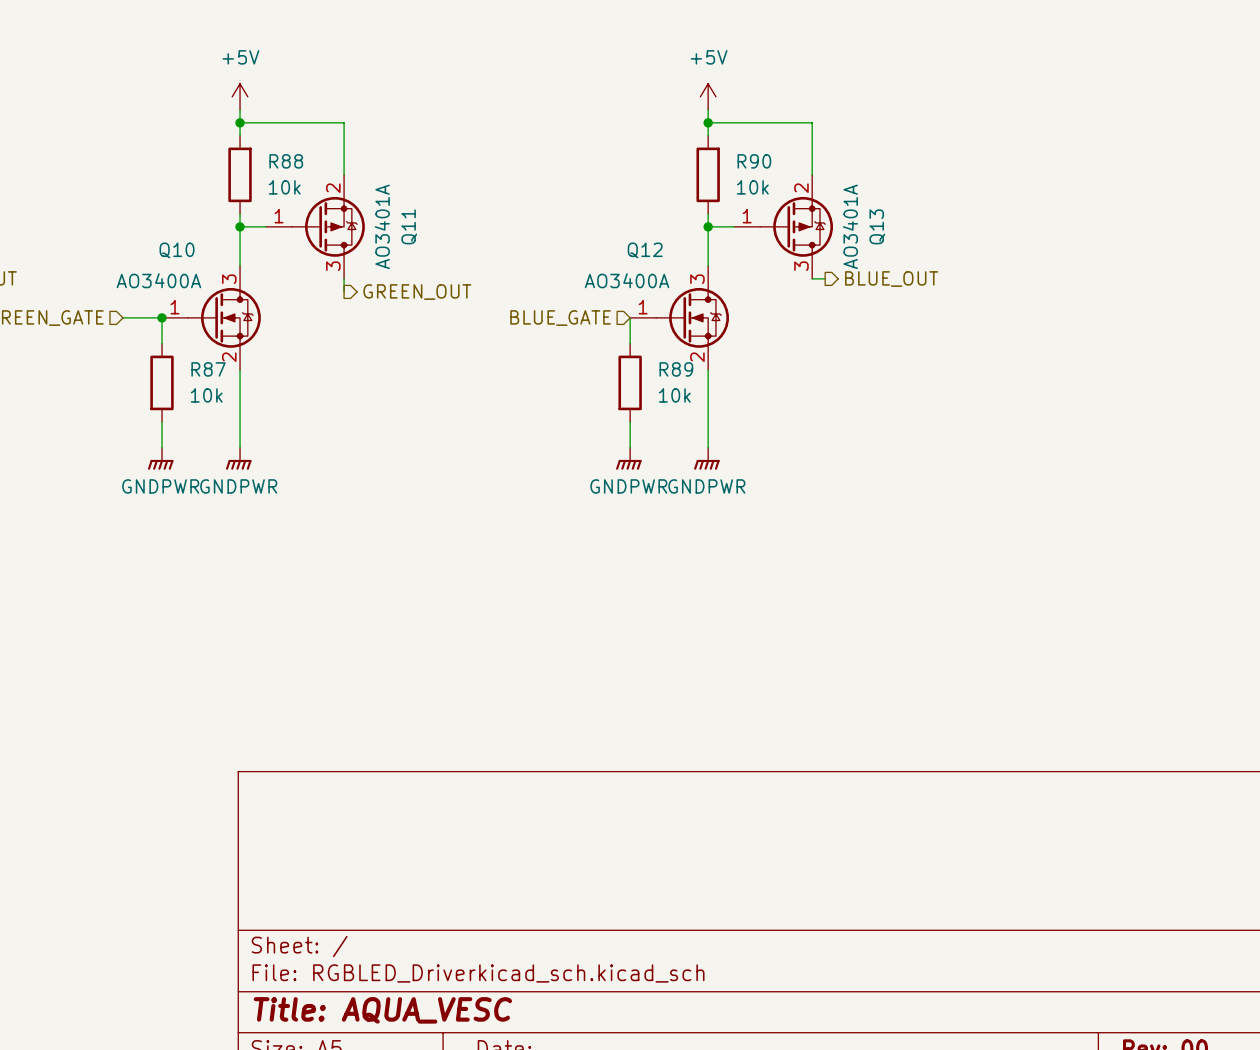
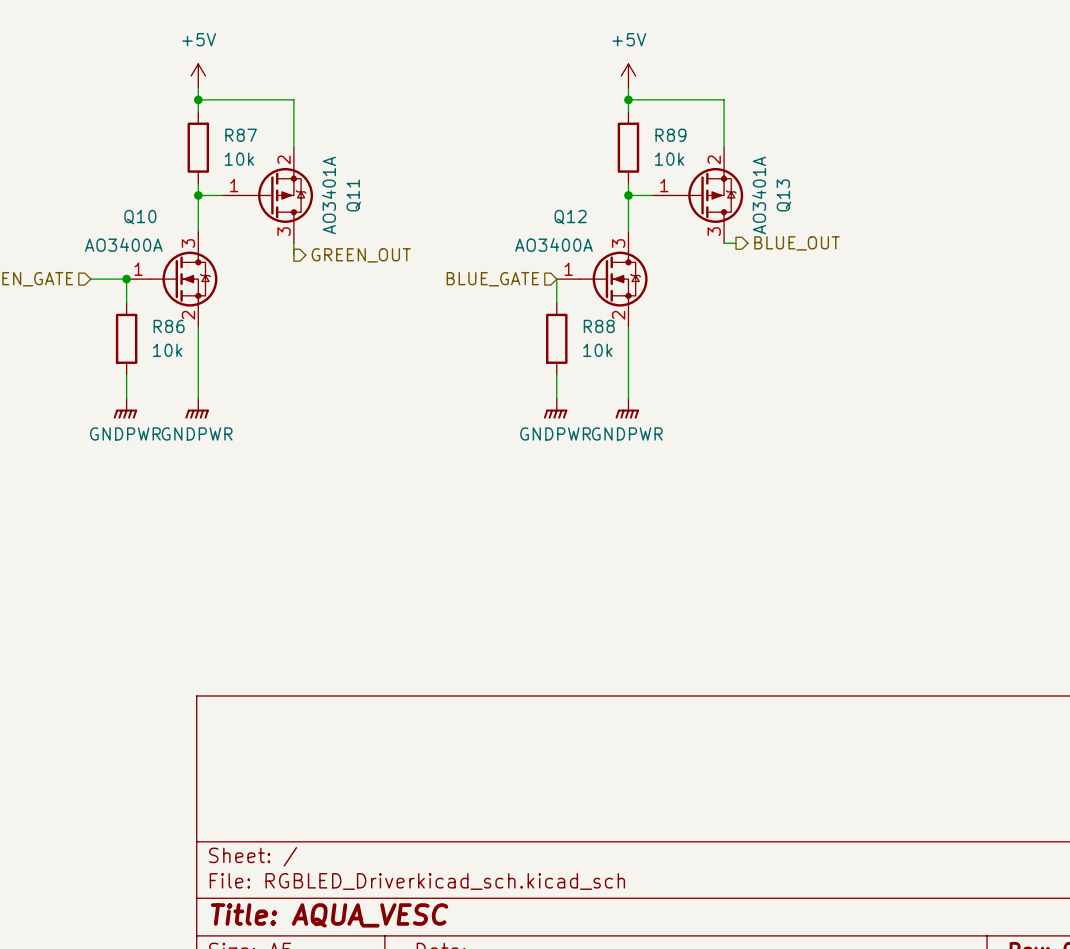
R88 name: R88 (286, 161) -> R87 (241, 135)
R90 name: R90 (754, 161) -> R89 (670, 135)
R87 name: R87 (208, 369) -> R86 (169, 326)
R89 name: R89 (676, 369) -> R88 (599, 326)

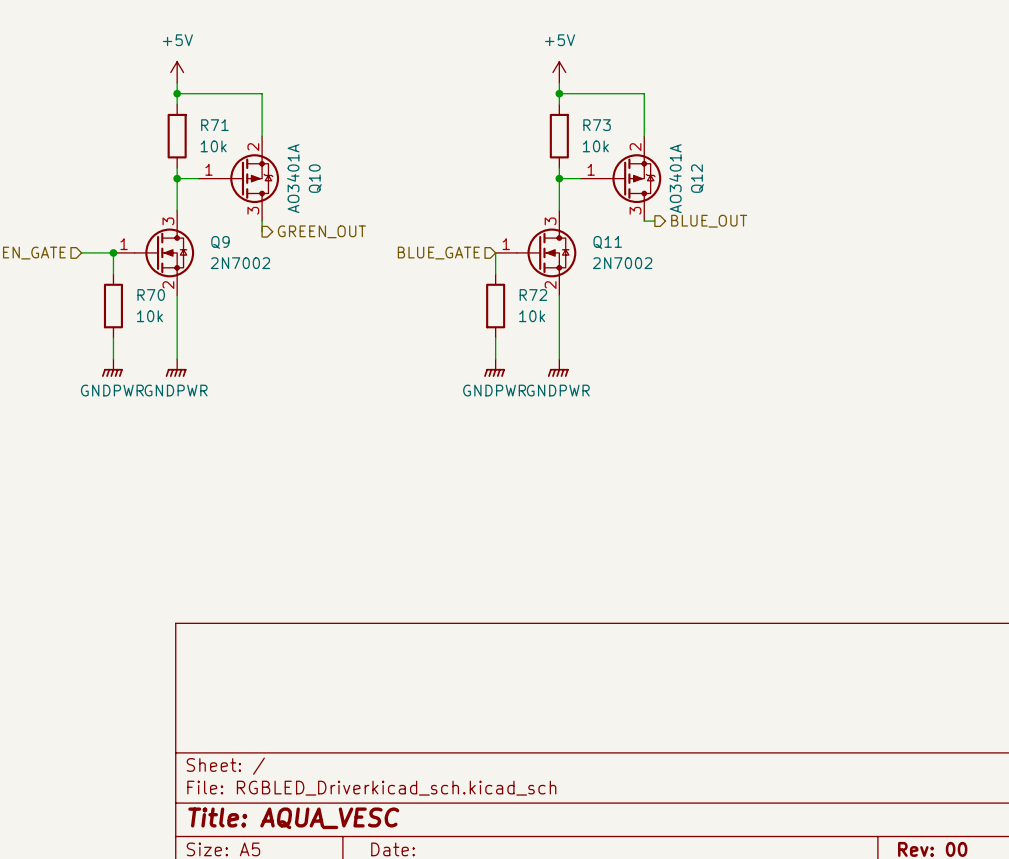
R87 name: R87 (241, 135) -> R71 (214, 125)
R89 name: R89 (670, 135) -> R73 (597, 125)
Q11 name: Q11 (353, 195) -> Q10 (315, 178)
Q13 name: Q13 (783, 195) -> Q12 (697, 178)
Q10: AO3400A (172, 279) -> none
Q9: none -> 2N7002 (153, 252)
Q12: AO3400A (602, 279) -> none
Q11: none -> 2N7002 (535, 252)
R86 name: R86 (169, 326) -> R70 (151, 295)
R88 name: R88 (599, 326) -> R72 (533, 295)

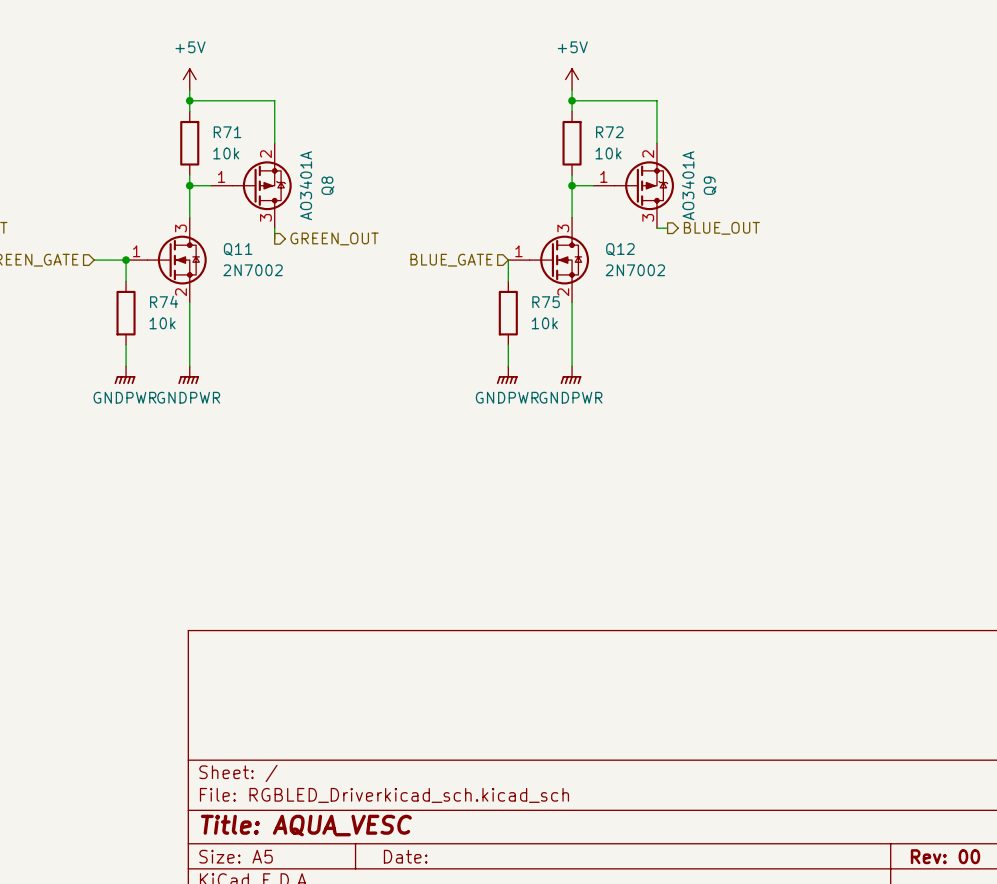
R73 name: R73 (597, 125) -> R72 (609, 132)
Q10 name: Q10 (315, 178) -> Q8 (327, 185)
Q12 name: Q12 (697, 178) -> Q9 (710, 185)
Q9 name: Q9 (220, 242) -> Q11 (238, 249)
Q11 name: Q11 (607, 242) -> Q12 (620, 249)
R70 name: R70 (151, 295) -> R74 (164, 301)
R72 name: R72 (533, 295) -> R75 (546, 302)

